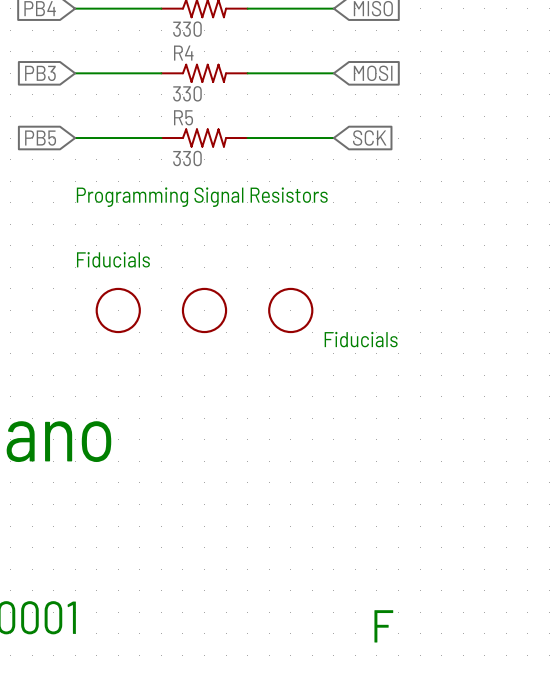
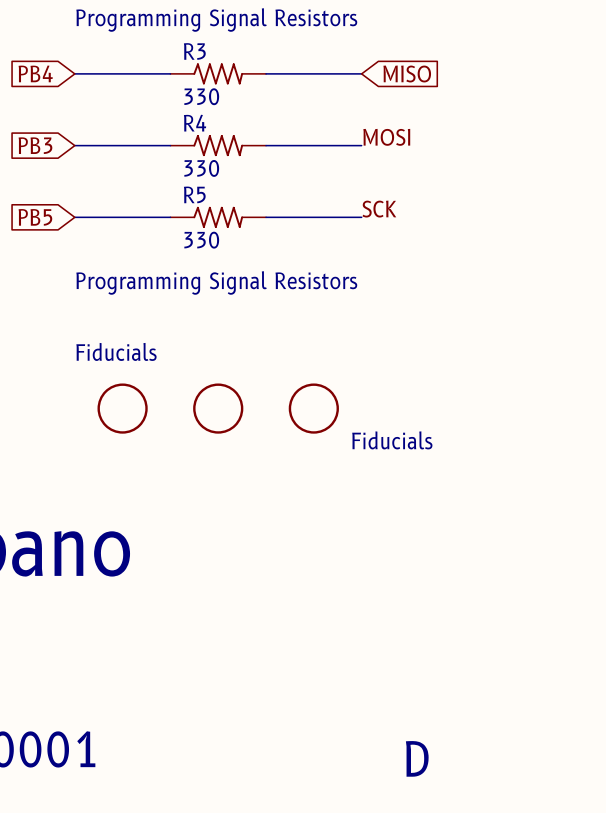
label: none -> MOSI (386, 137)
global label: MOSI (373, 73) -> none
label: none -> SCK (379, 209)
global label: SCK (369, 138) -> none
text: F (383, 626) -> D (417, 758)

